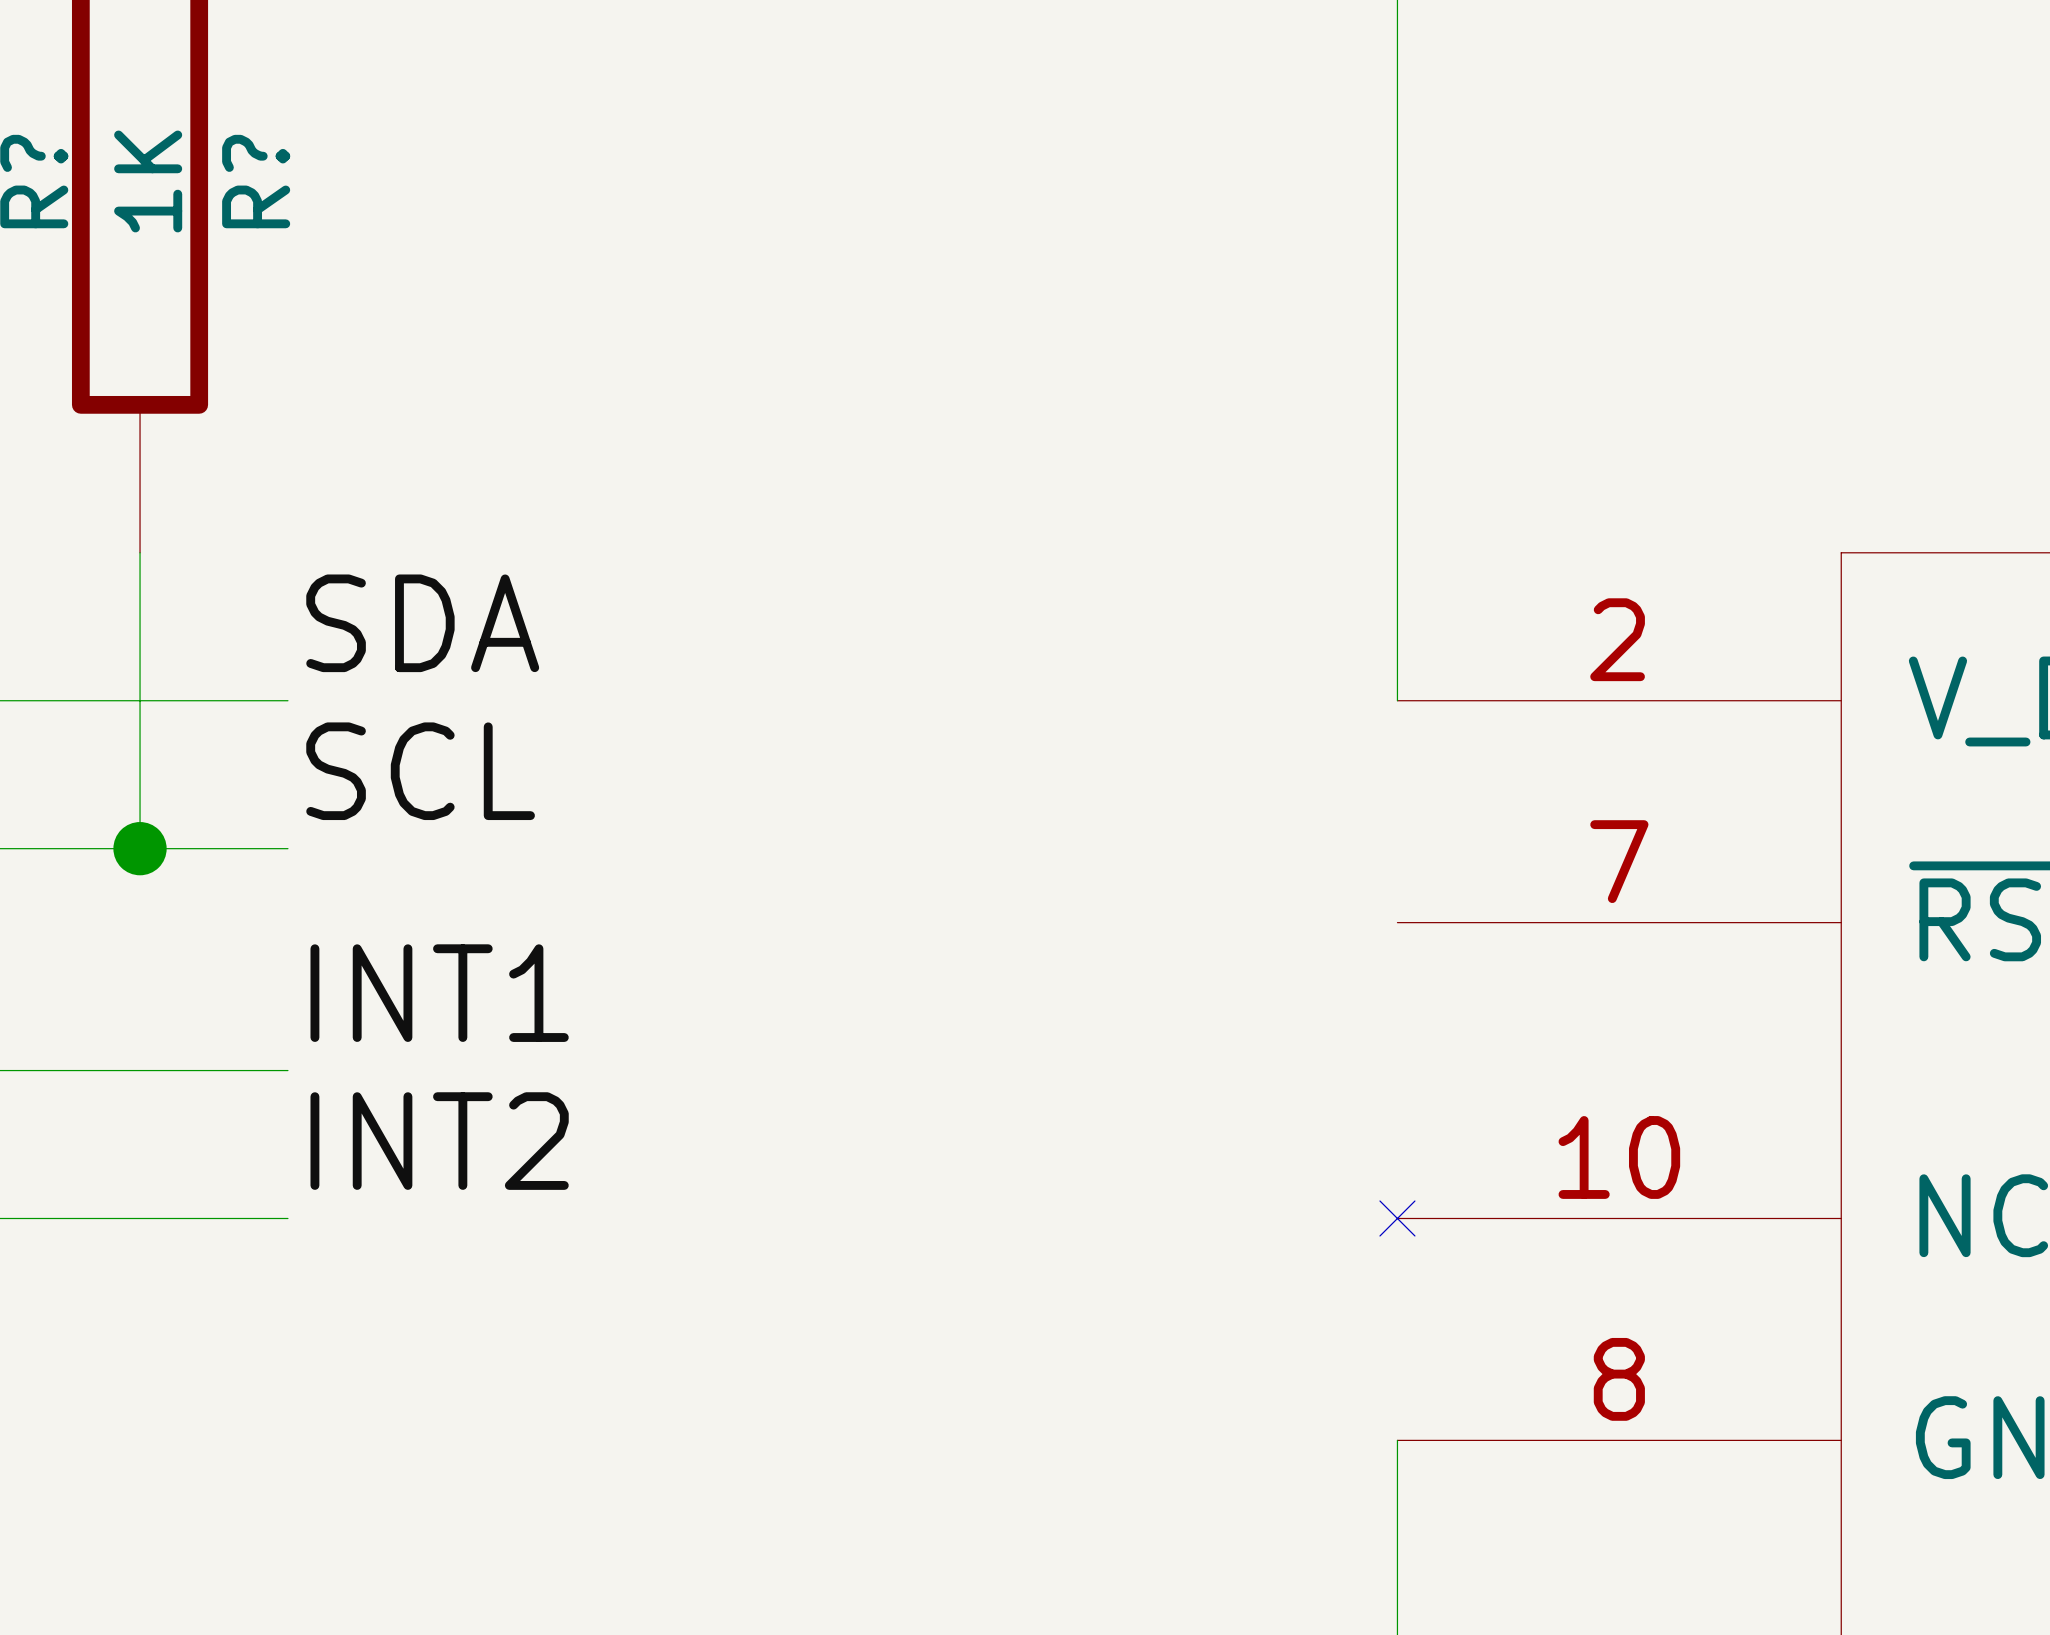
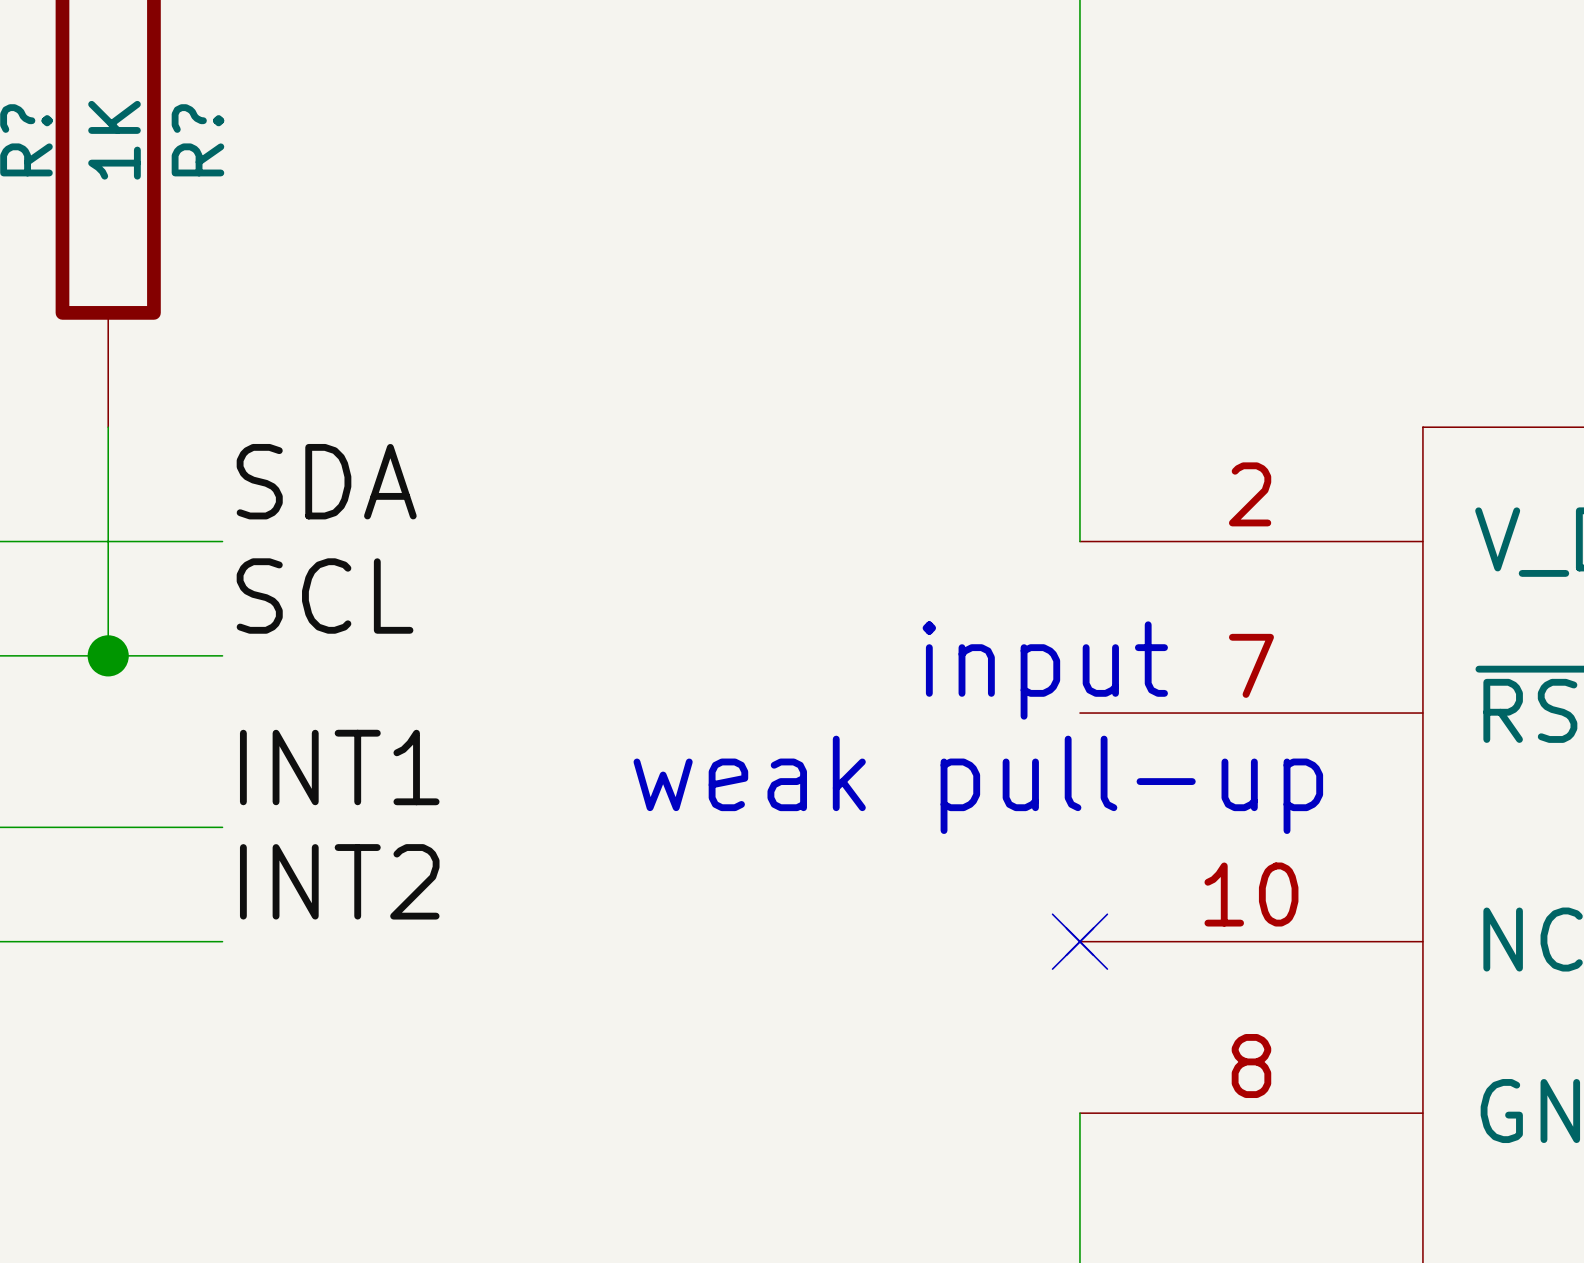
text: none -> input (1045, 670)
text: none -> weak pull-up (978, 784)
no-connect mark: none -> (1079, 941)

